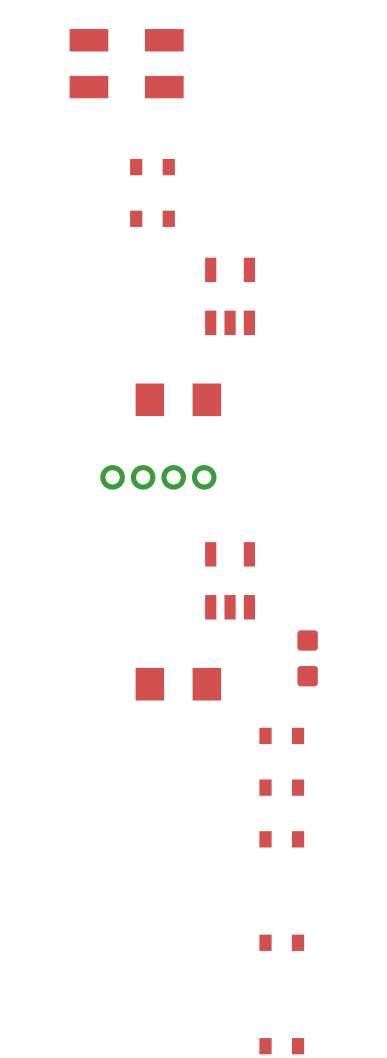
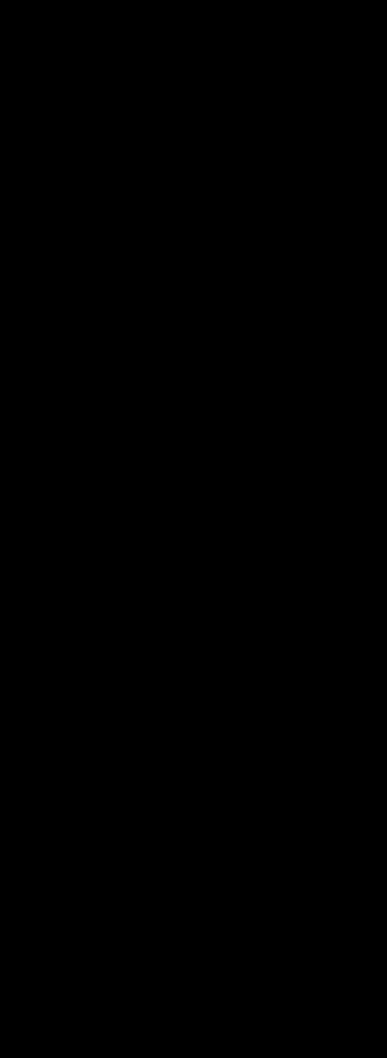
part: (126, 63) -> none
part: (152, 167) -> none
part: (152, 218) -> none
part: (230, 296) -> none
part: (178, 399) -> none
part: (158, 477) -> none
part: (230, 580) -> none
part: (307, 658) -> none
part: (178, 684) -> none
part: (281, 735) -> none
part: (281, 787) -> none
part: (281, 839) -> none
part: (281, 942) -> none
part: (281, 1046) -> none

